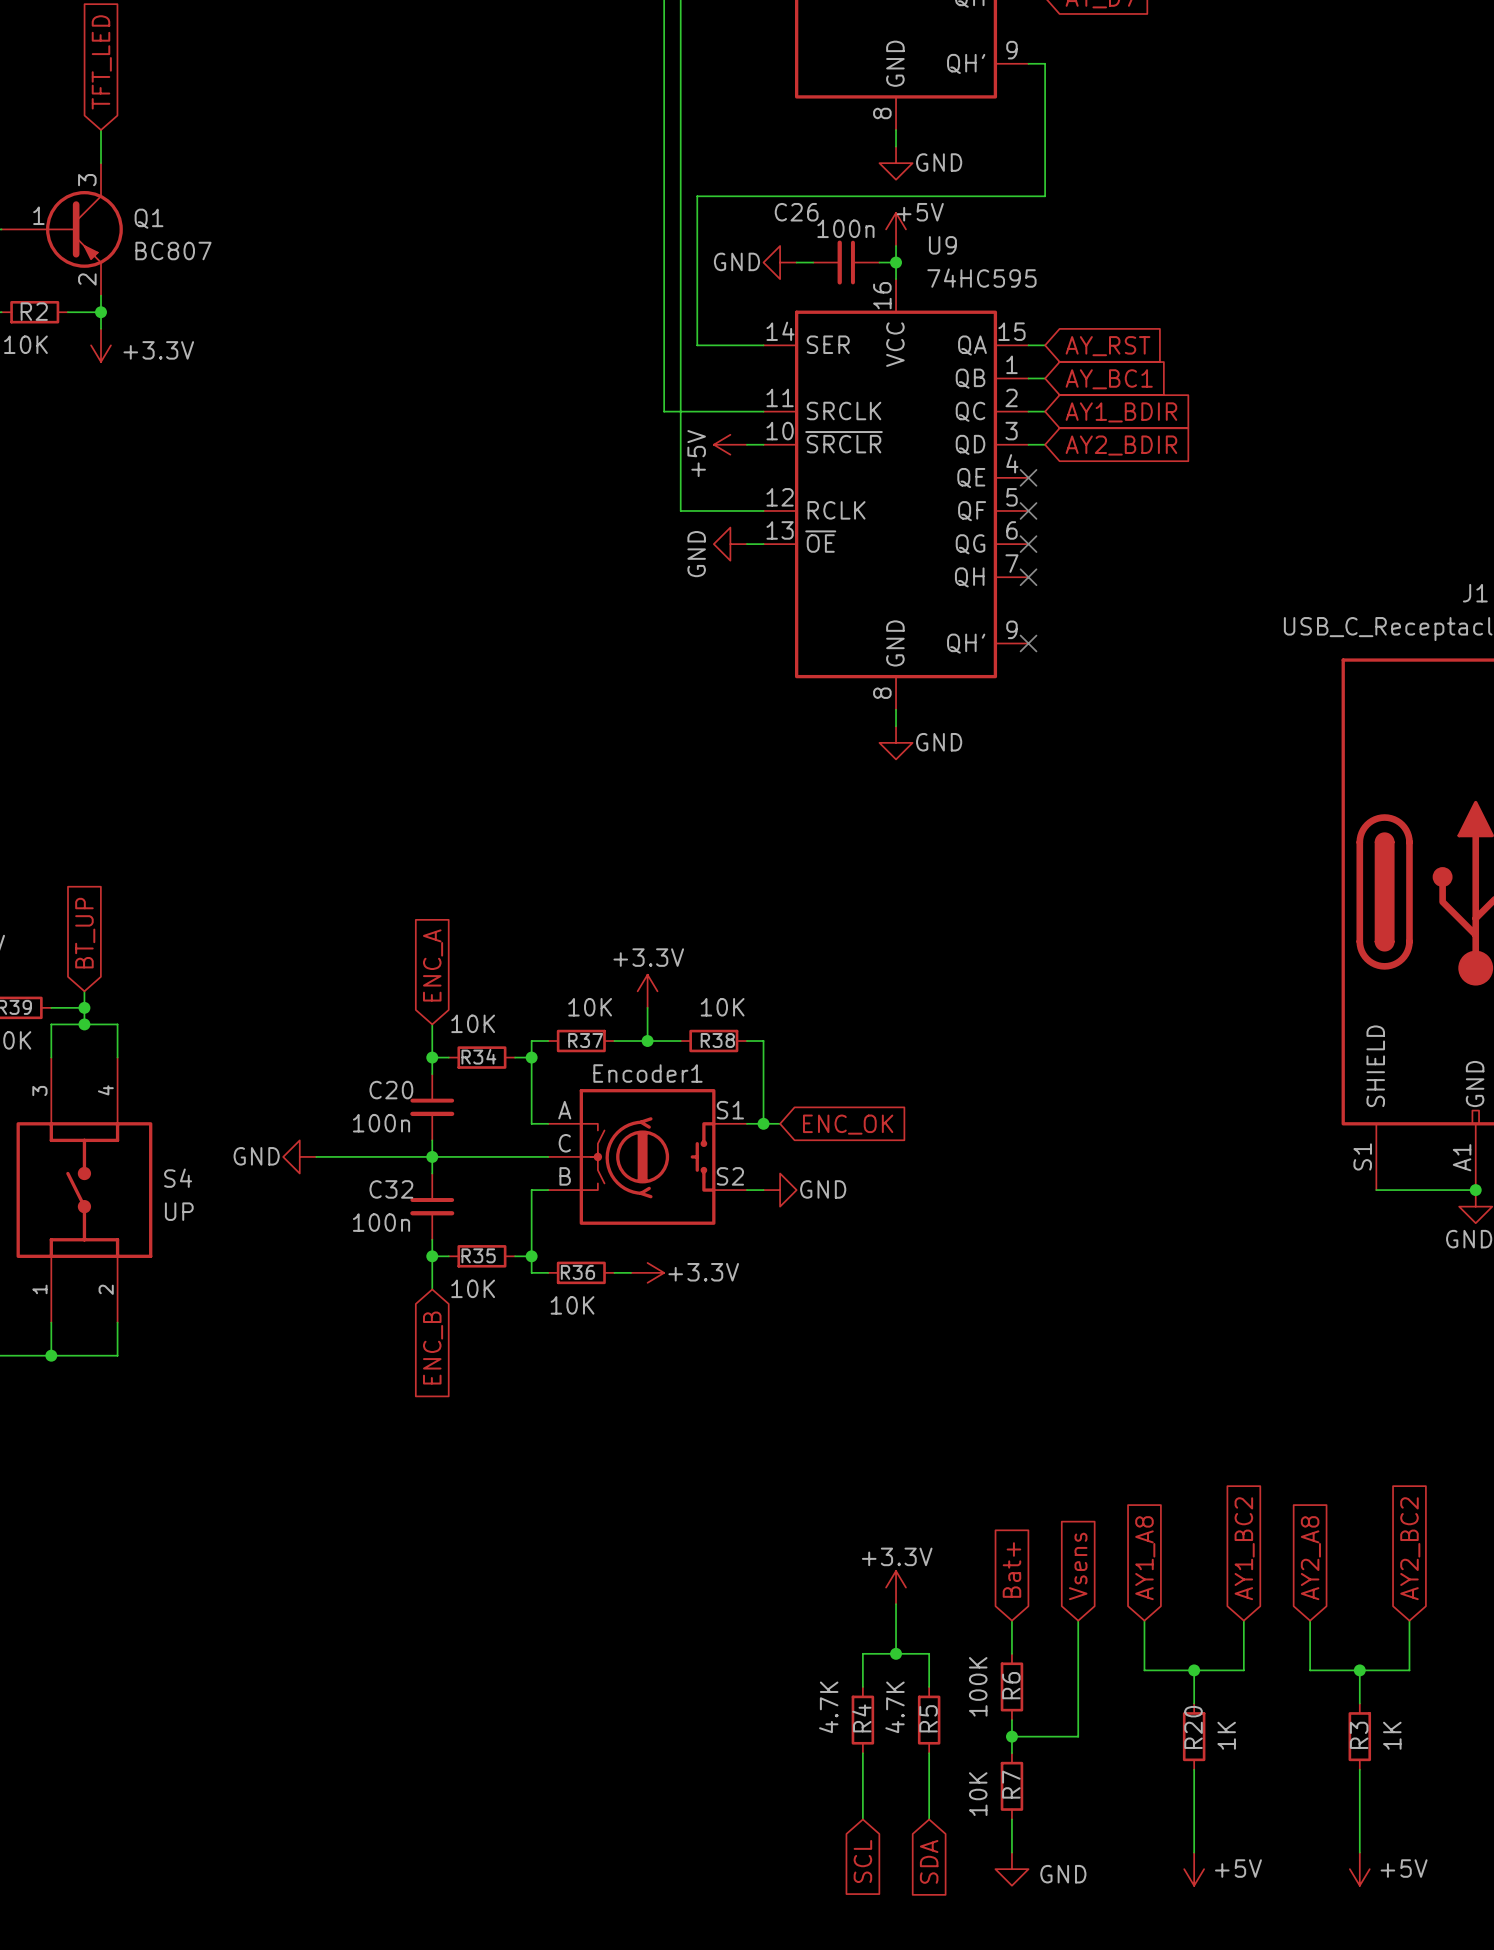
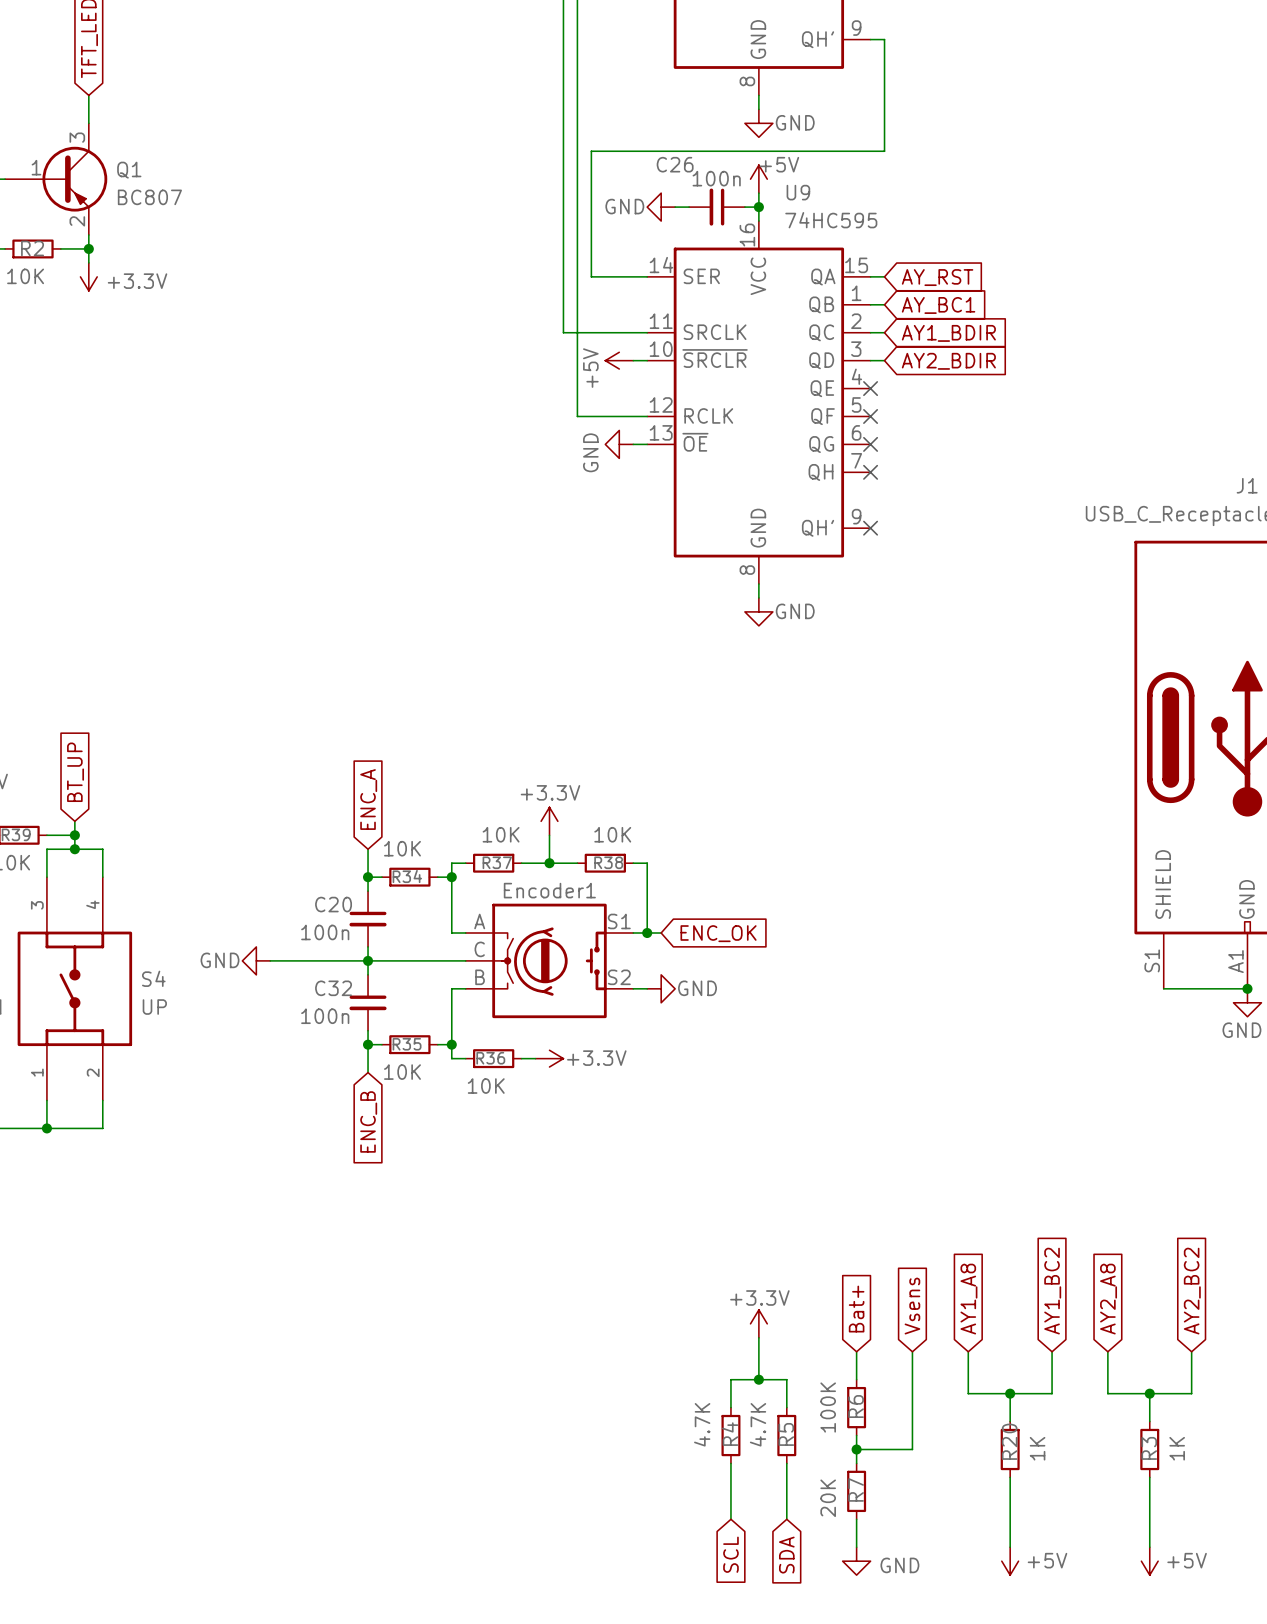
R7 value: 10K (978, 1794) -> 20K (828, 1498)

